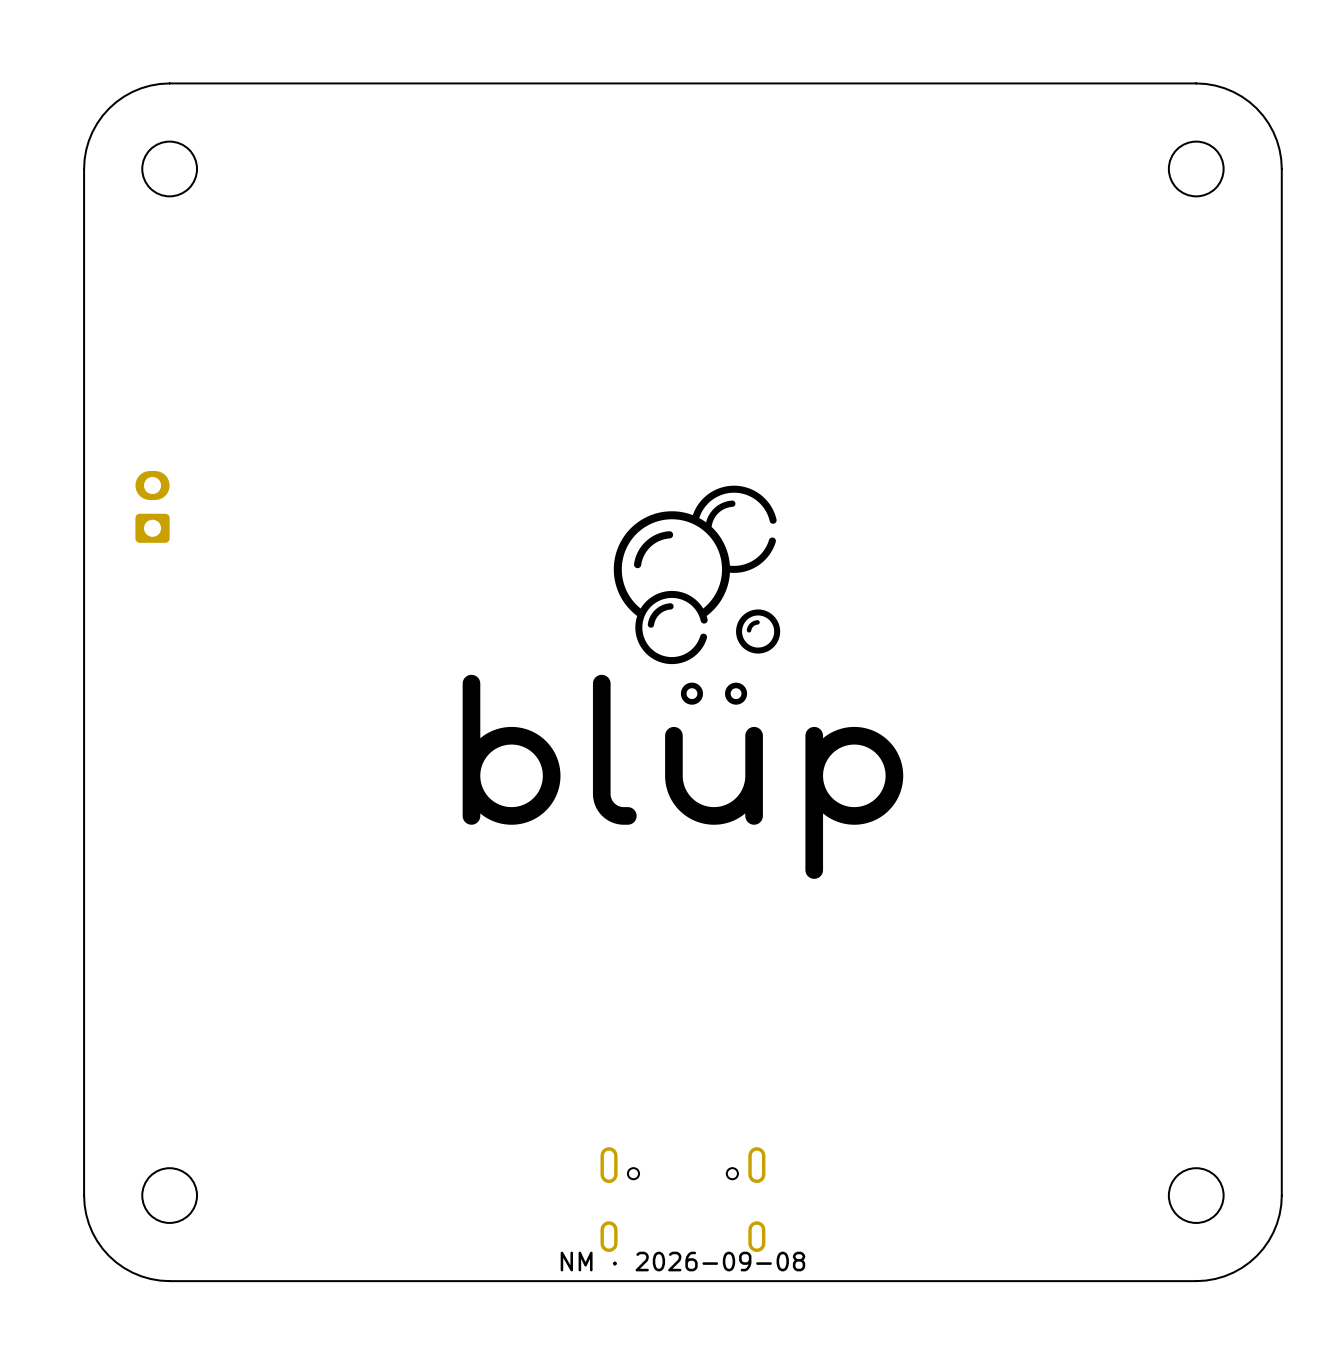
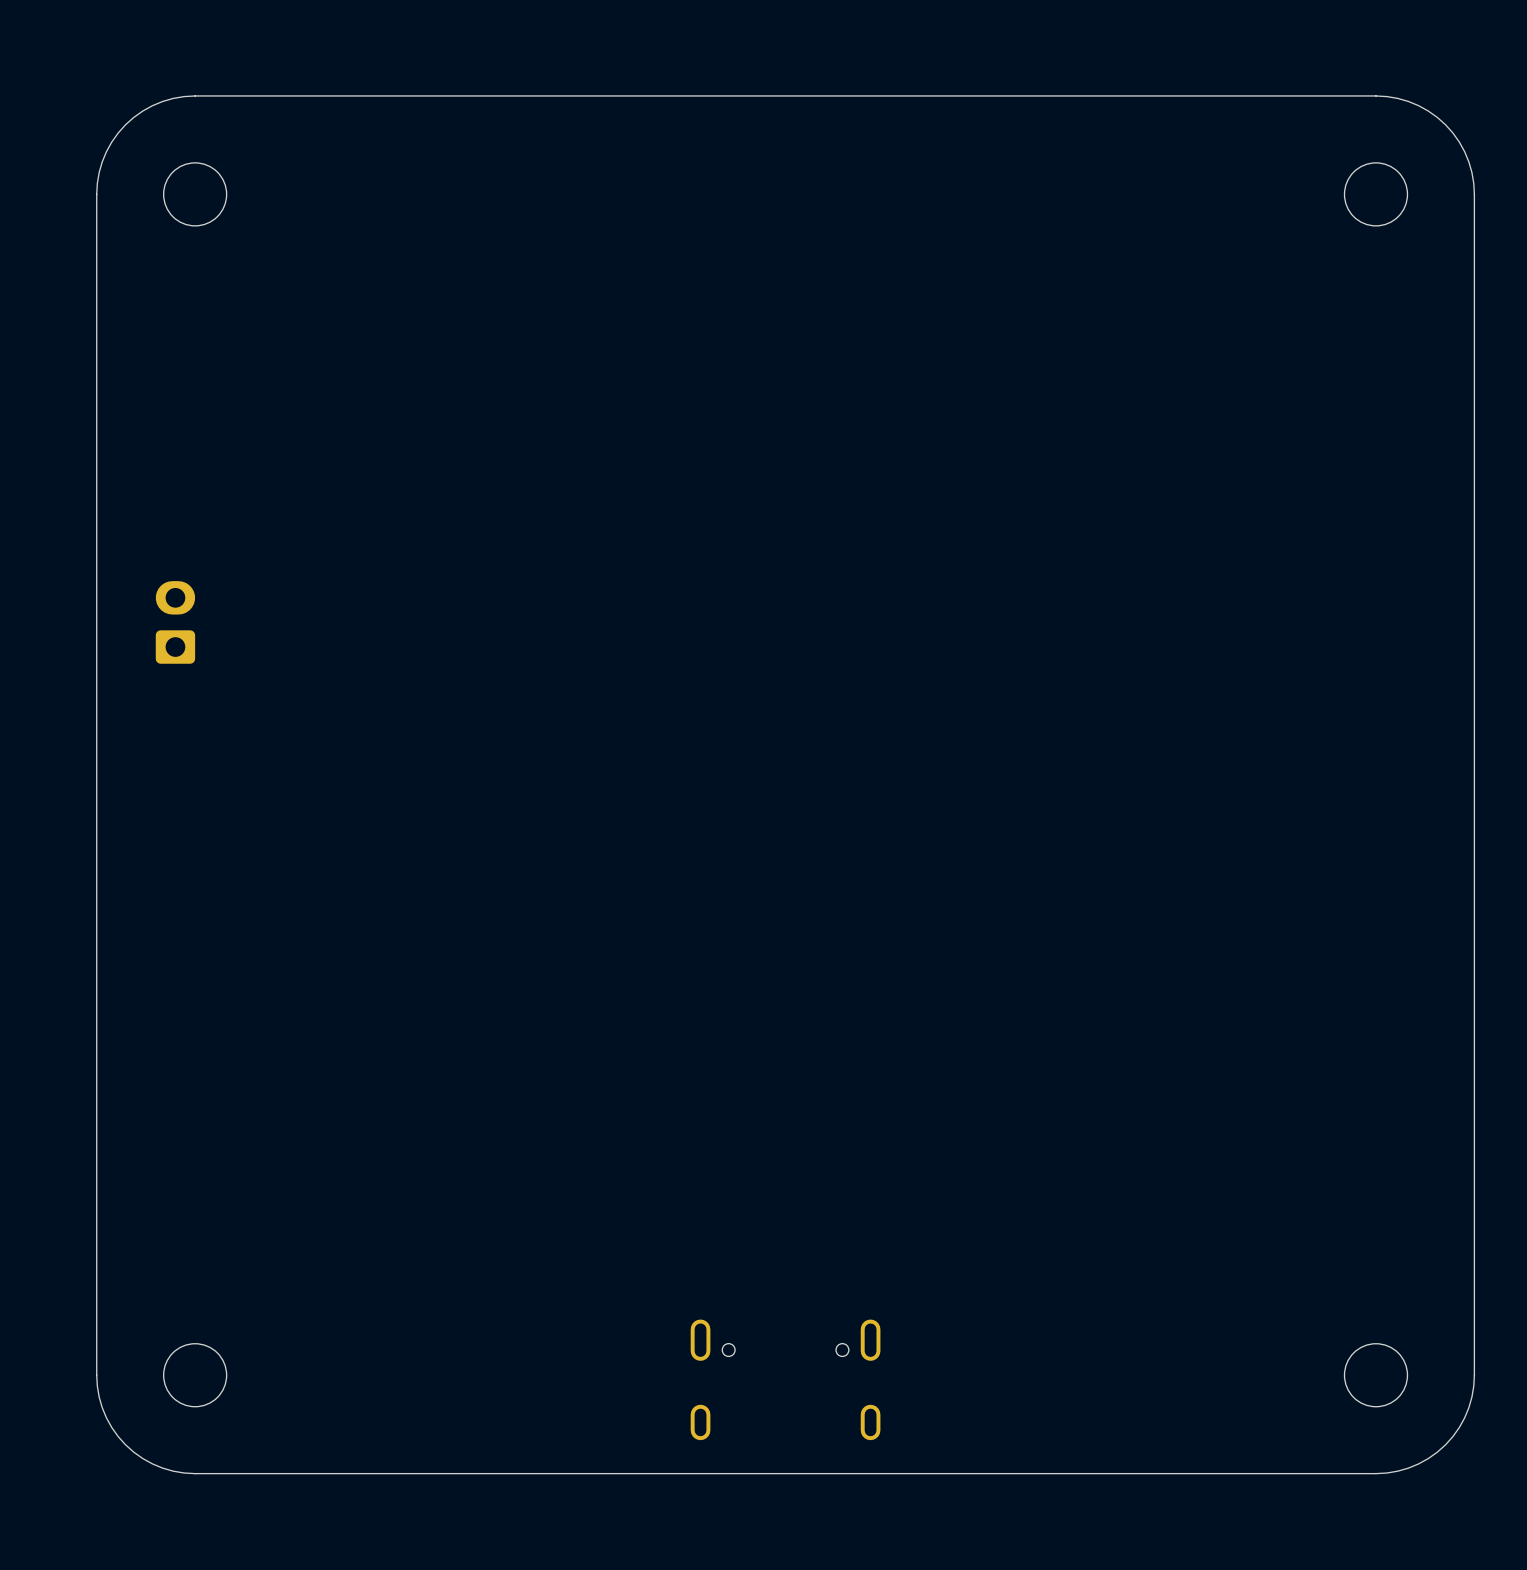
drawing: [592, 485, 781, 825] -> none
part position: (152, 506) -> (175, 622)
drawing: [462, 674, 561, 825] -> none
drawing: [665, 726, 763, 825] -> none
drawing: [805, 726, 904, 879] -> none
drawing: [560, 1251, 806, 1272] -> none

